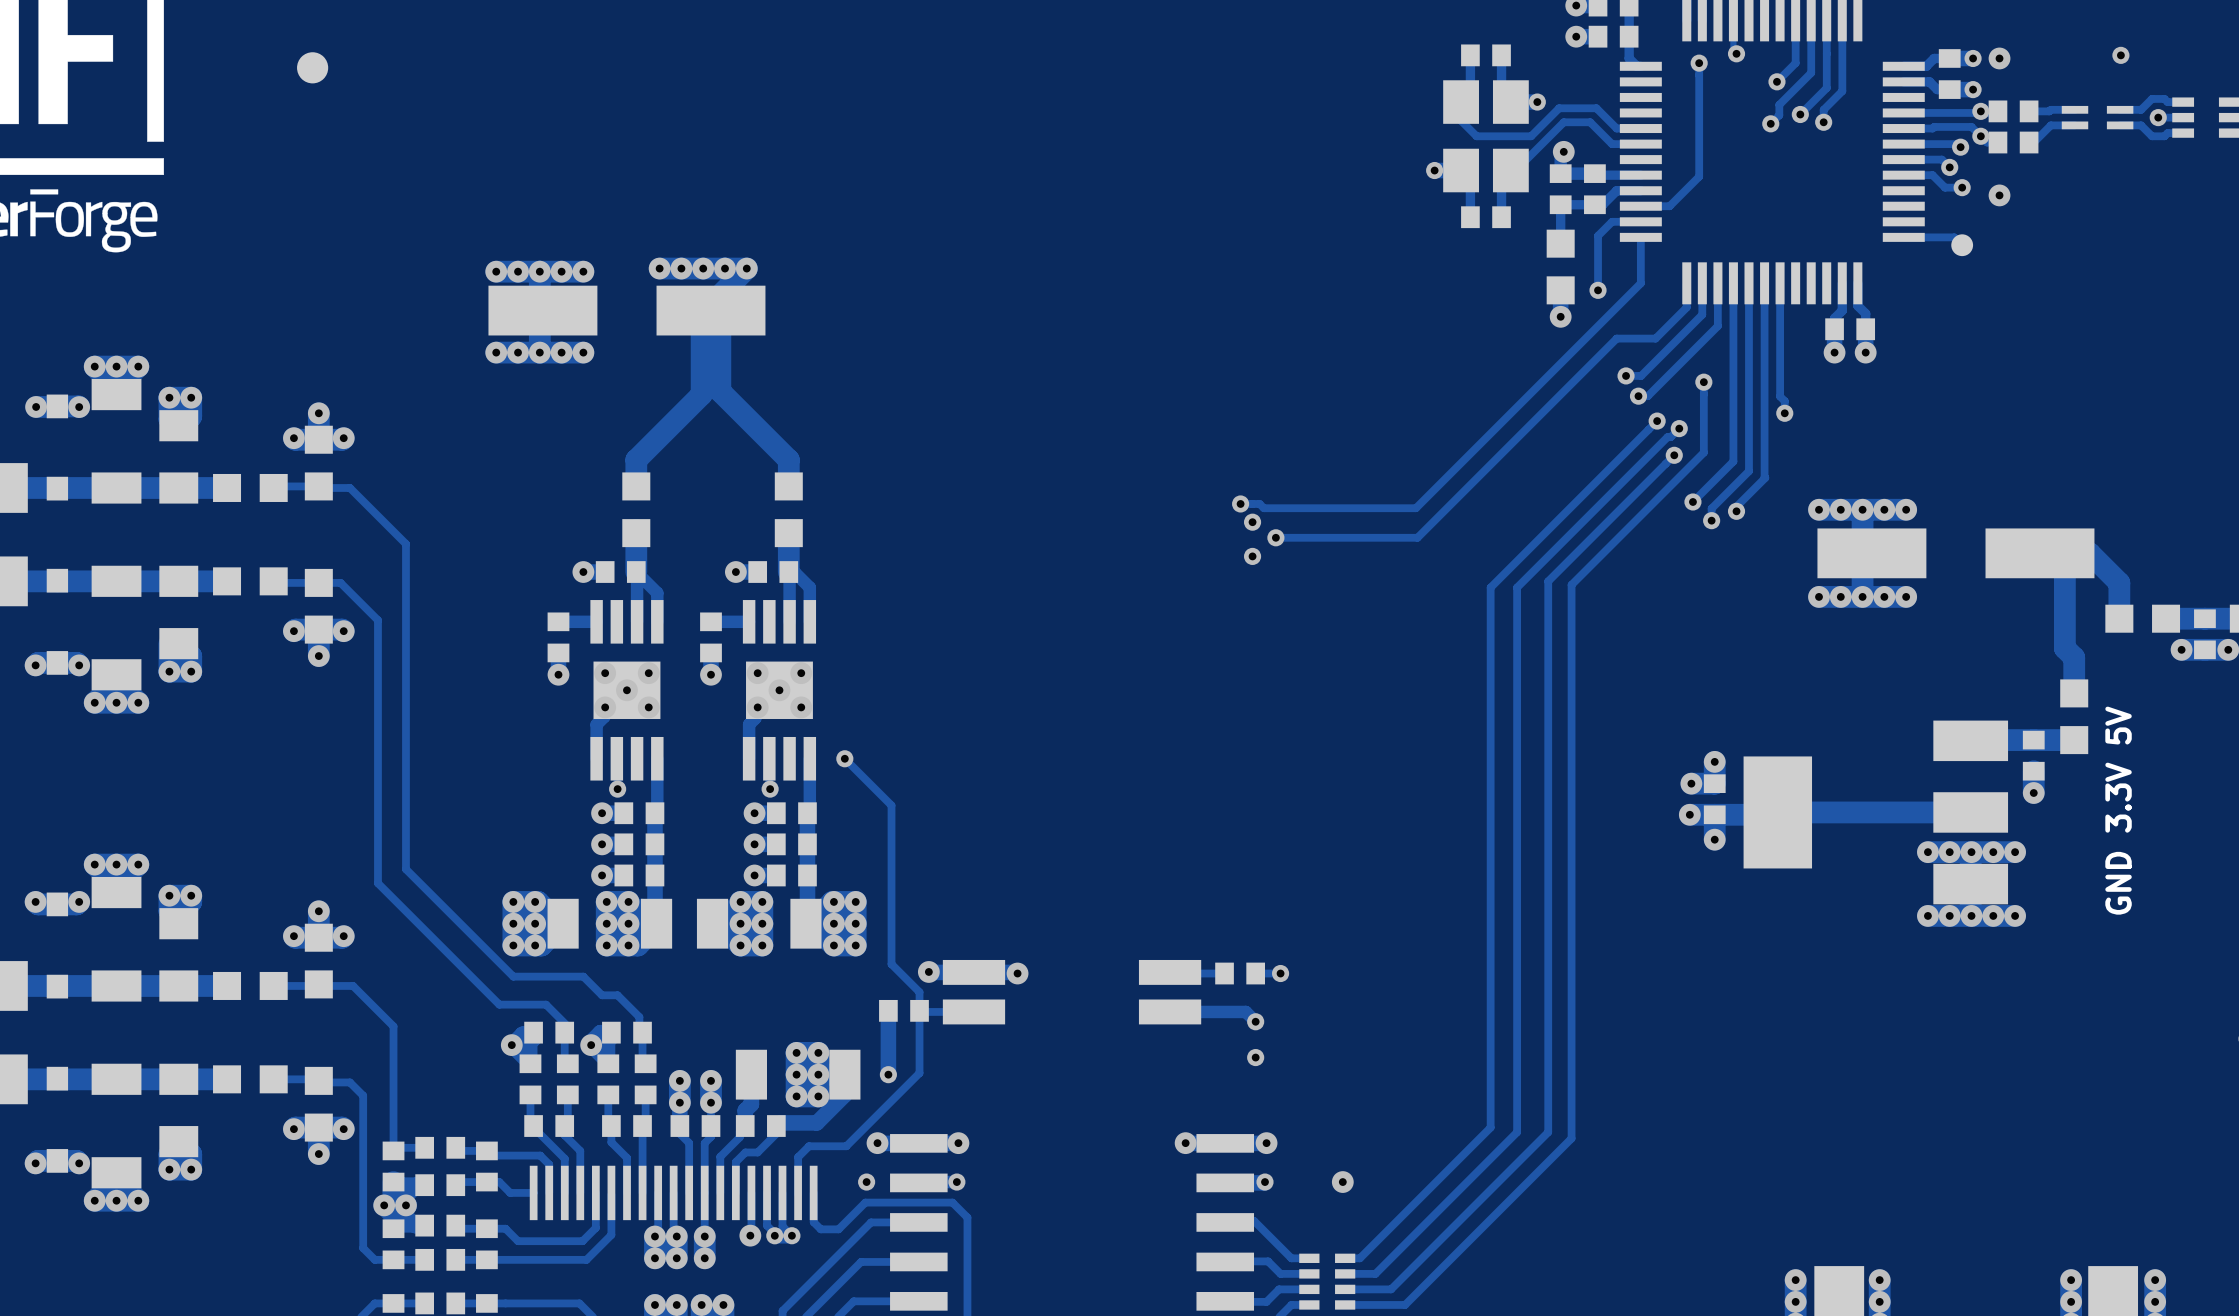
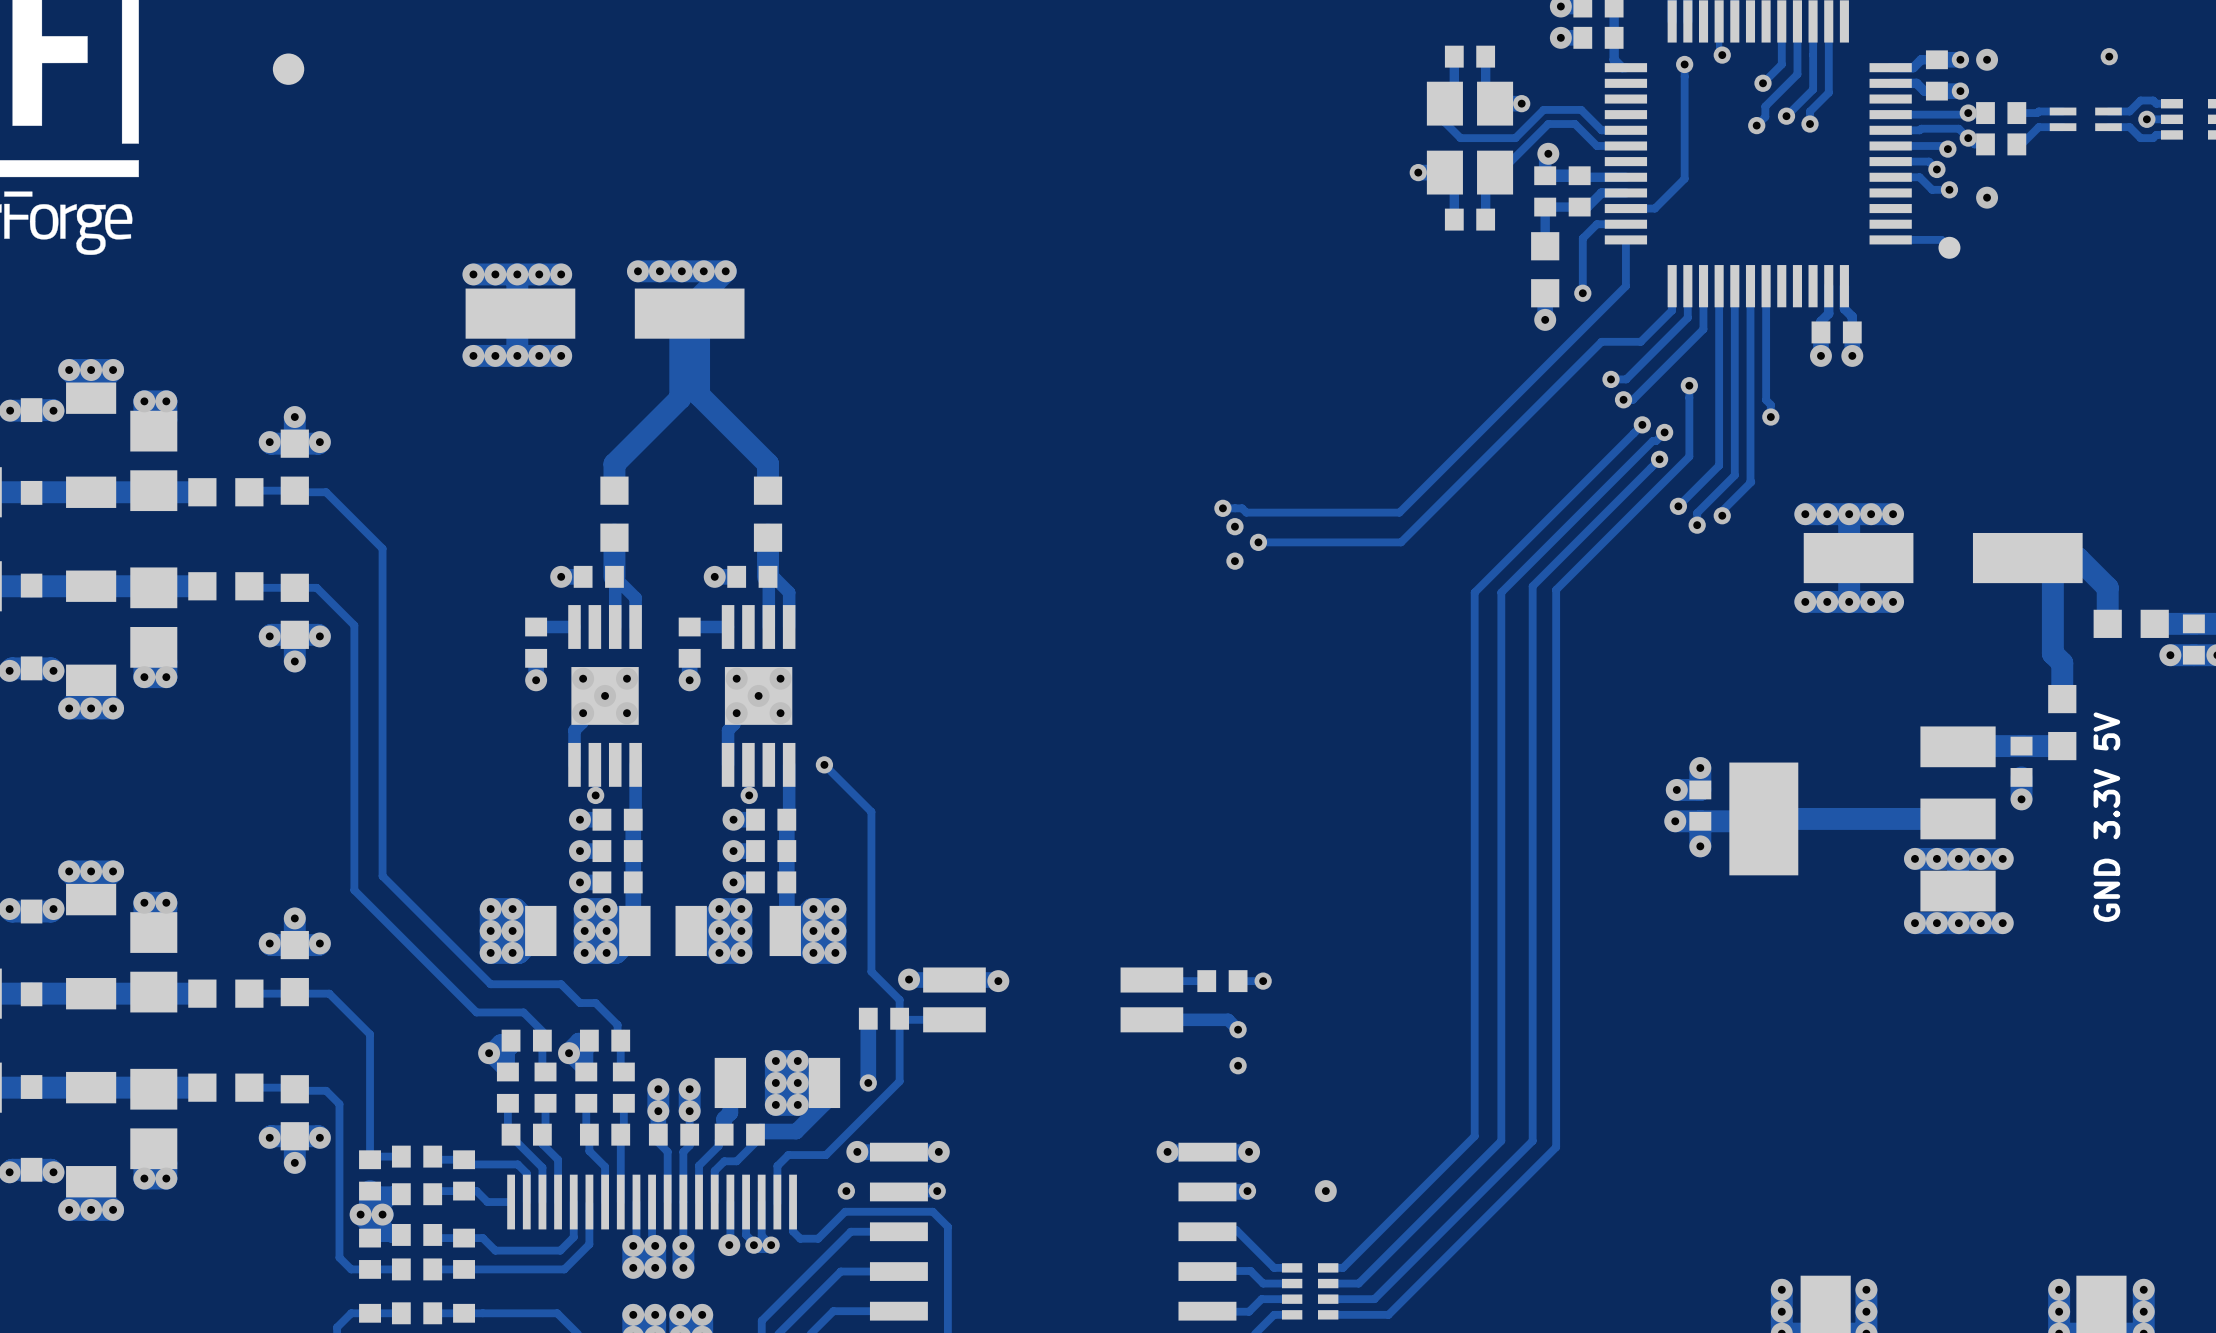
part footprint: [159, 410, 199, 504] -> [130, 410, 178, 512]
part footprint: [159, 565, 199, 660] -> [130, 567, 178, 668]
part footprint: [159, 908, 199, 1002] -> [130, 912, 178, 1013]
part footprint: [159, 1063, 199, 1158] -> [130, 1068, 178, 1170]

